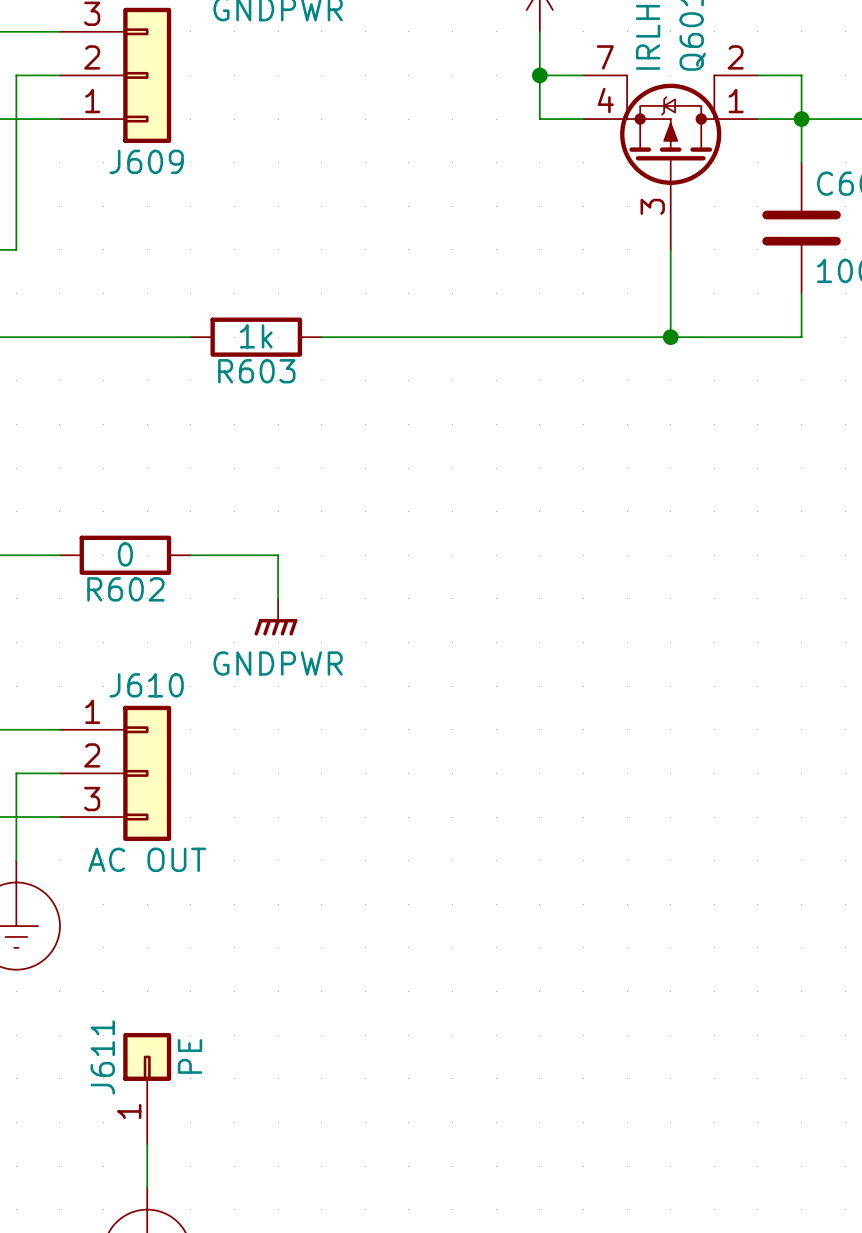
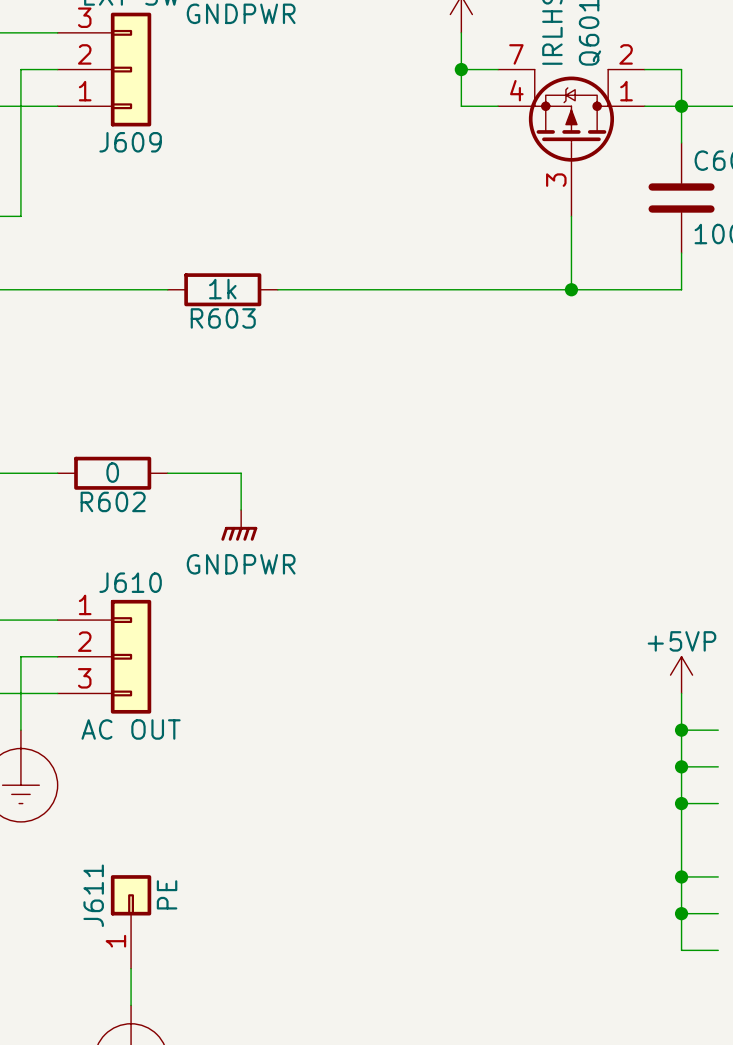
power symbol: none -> +5VP (681, 675)
wire: none -> (681, 693) (681, 950) (718, 950)
wire: none -> (681, 730) (718, 730)
junction: none -> (681, 730)
wire: none -> (681, 766) (718, 766)
junction: none -> (681, 766)
wire: none -> (681, 803) (718, 803)
junction: none -> (681, 803)
wire: none -> (681, 876) (718, 876)
junction: none -> (681, 876)
wire: none -> (681, 913) (718, 913)
junction: none -> (681, 913)

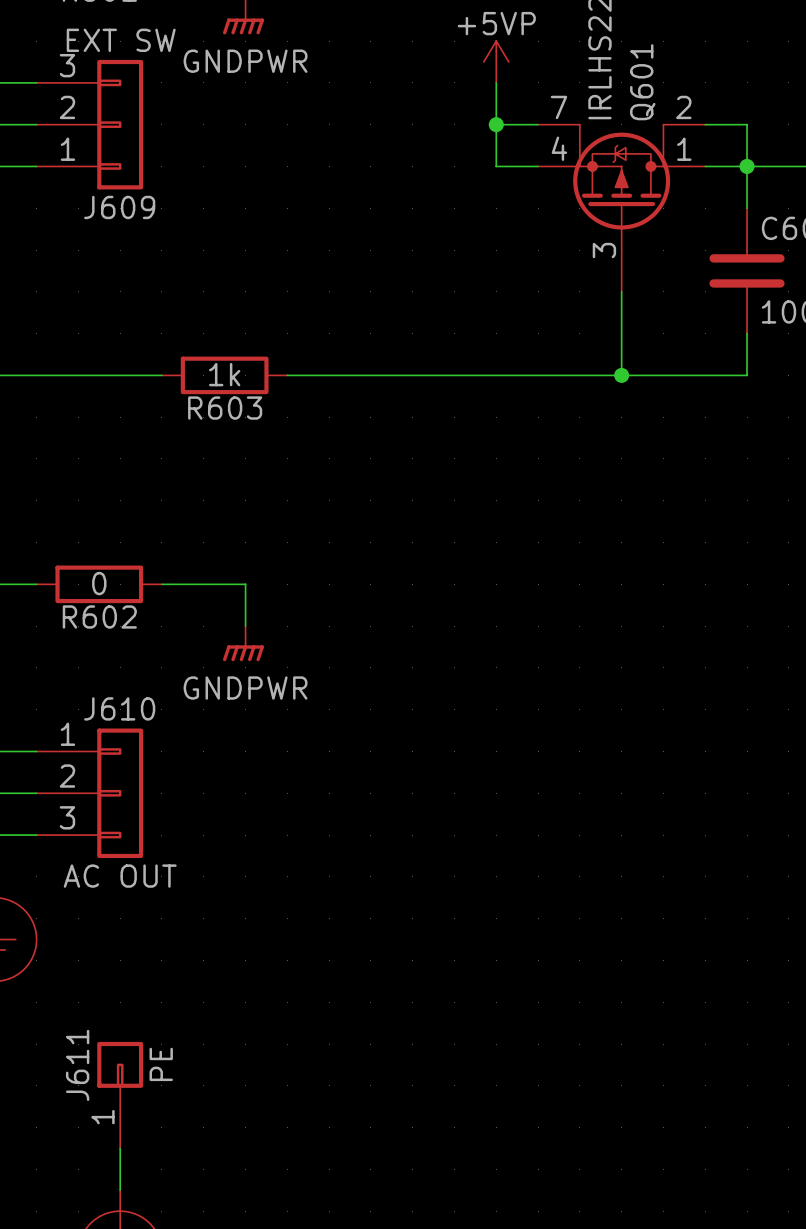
power symbol: +5VP (681, 675) -> none
wire: (681, 693) (681, 950) (718, 950) -> none
wire: (681, 730) (718, 730) -> none
junction: (681, 730) -> none
wire: (681, 766) (718, 766) -> none
junction: (681, 766) -> none
wire: (681, 803) (718, 803) -> none
junction: (681, 803) -> none
wire: (681, 876) (718, 876) -> none
junction: (681, 876) -> none
wire: (681, 913) (718, 913) -> none
junction: (681, 913) -> none

